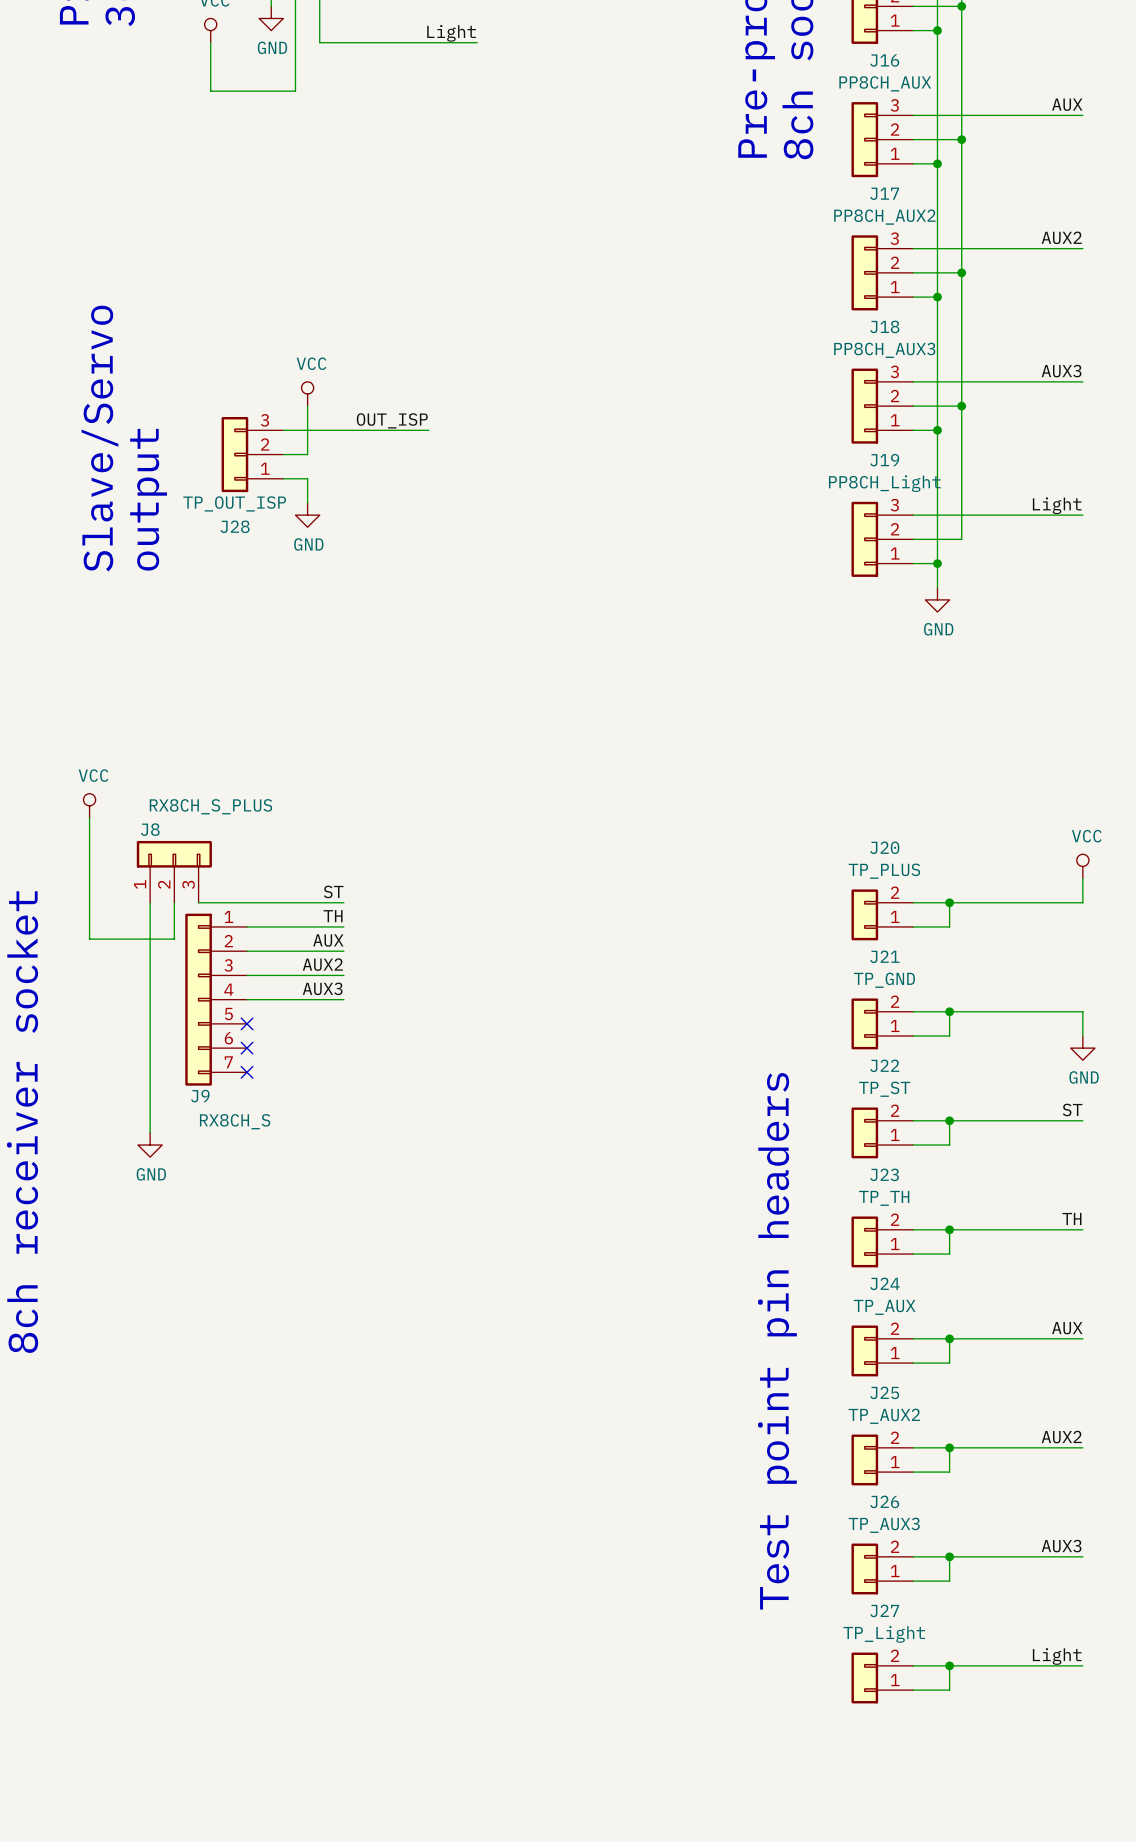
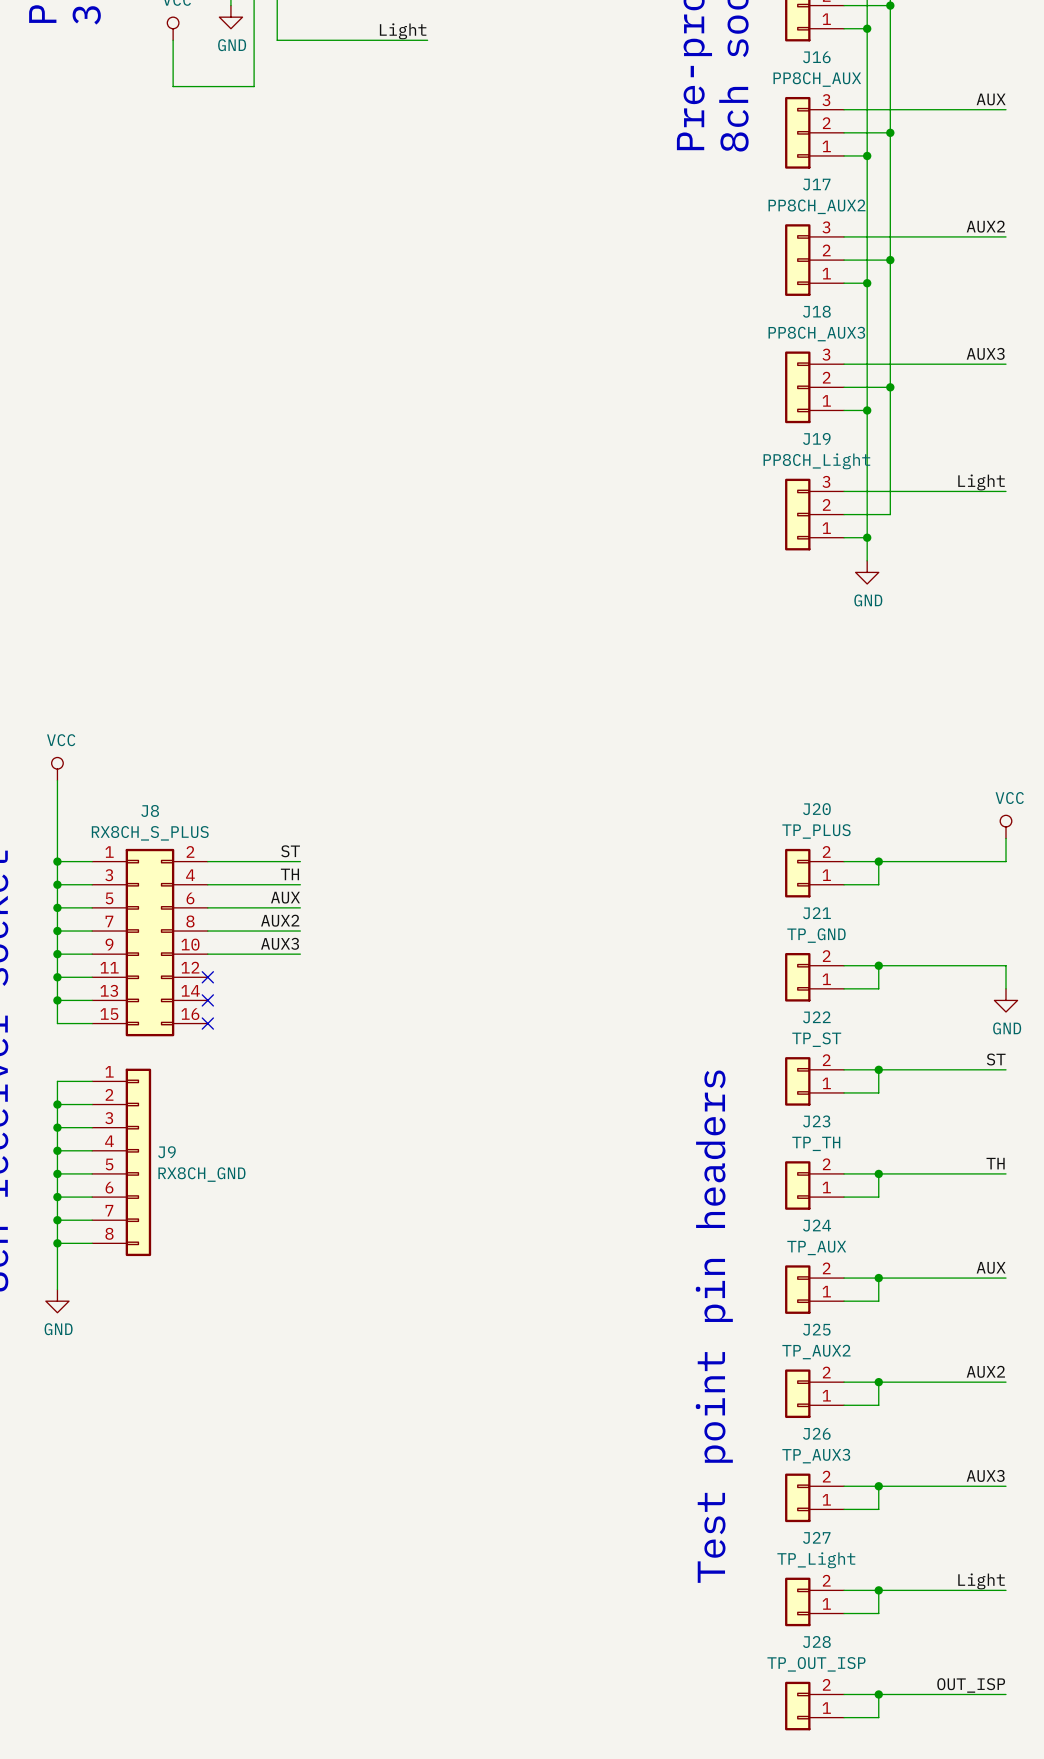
power symbol: VCC (307, 393) -> none
wire: (307, 406) (307, 454) (283, 454) -> none
J28 symbol: [221, 417, 284, 493] -> [785, 1681, 845, 1731]
label: OUT_ISP (392, 420) -> none
wire: (283, 430) (428, 430) -> none
text: Slave/Servo (99, 438) -> none
wire: (283, 478) (307, 478) (307, 503) -> none
text: output (148, 499) -> none
J28 value position: TP_OUT_ISP (234, 503) -> TP_OUT_ISP (816, 1664)
power symbol: GND (307, 515) -> none
J28 name position: J28 (235, 526) -> J28 (816, 1642)
J8 value position: RX8CH_S_PLUS (210, 806) -> RX8CH_S_PLUS (150, 833)
J8 name position: J8 (150, 829) -> J8 (150, 810)
J8 symbol: [136, 840, 212, 903] -> [92, 848, 208, 1037]
wire: none -> (57, 861) (92, 861)
junction: none -> (57, 861)
wire: (150, 902) (150, 1132) -> none
wire: (174, 902) (174, 939) (89, 939) -> (92, 1023) (57, 1023) (57, 896)
J9 symbol: [185, 913, 248, 1086] -> [92, 1068, 152, 1257]
wire: none -> (57, 884) (92, 884)
junction: none -> (57, 884)
wire: none -> (57, 907) (92, 907)
junction: none -> (57, 907)
wire: none -> (57, 931) (92, 931)
junction: none -> (57, 931)
wire: none -> (57, 954) (92, 954)
junction: none -> (57, 954)
wire: none -> (57, 977) (92, 977)
junction: none -> (57, 977)
wire: none -> (57, 1000) (92, 1000)
junction: none -> (57, 1000)
J9 name position: J9 (200, 1096) -> J9 (166, 1152)
J9 value: RX8CH_S (235, 1121) -> RX8CH_GND (201, 1174)
wire: none -> (92, 1081) (57, 1081) (57, 1289)
power symbol position: GND (150, 1145) -> GND (57, 1301)
wire: none -> (57, 1104) (92, 1104)
junction: none -> (57, 1104)
wire: none -> (57, 1127) (92, 1127)
junction: none -> (57, 1127)
wire: none -> (57, 1150) (92, 1150)
junction: none -> (57, 1150)
wire: none -> (57, 1173) (92, 1173)
junction: none -> (57, 1173)
wire: none -> (57, 1197) (92, 1197)
junction: none -> (57, 1197)
wire: none -> (57, 1220) (92, 1220)
junction: none -> (57, 1220)
wire: none -> (57, 1243) (92, 1243)
junction: none -> (57, 1243)
text position: Test point pin headers (777, 1341) -> Test point pin headers (714, 1326)
label: none -> OUT_ISP (971, 1685)
wire: none -> (844, 1694) (1005, 1694)
wire: none -> (878, 1694) (878, 1717) (844, 1717)
junction: none -> (878, 1694)

